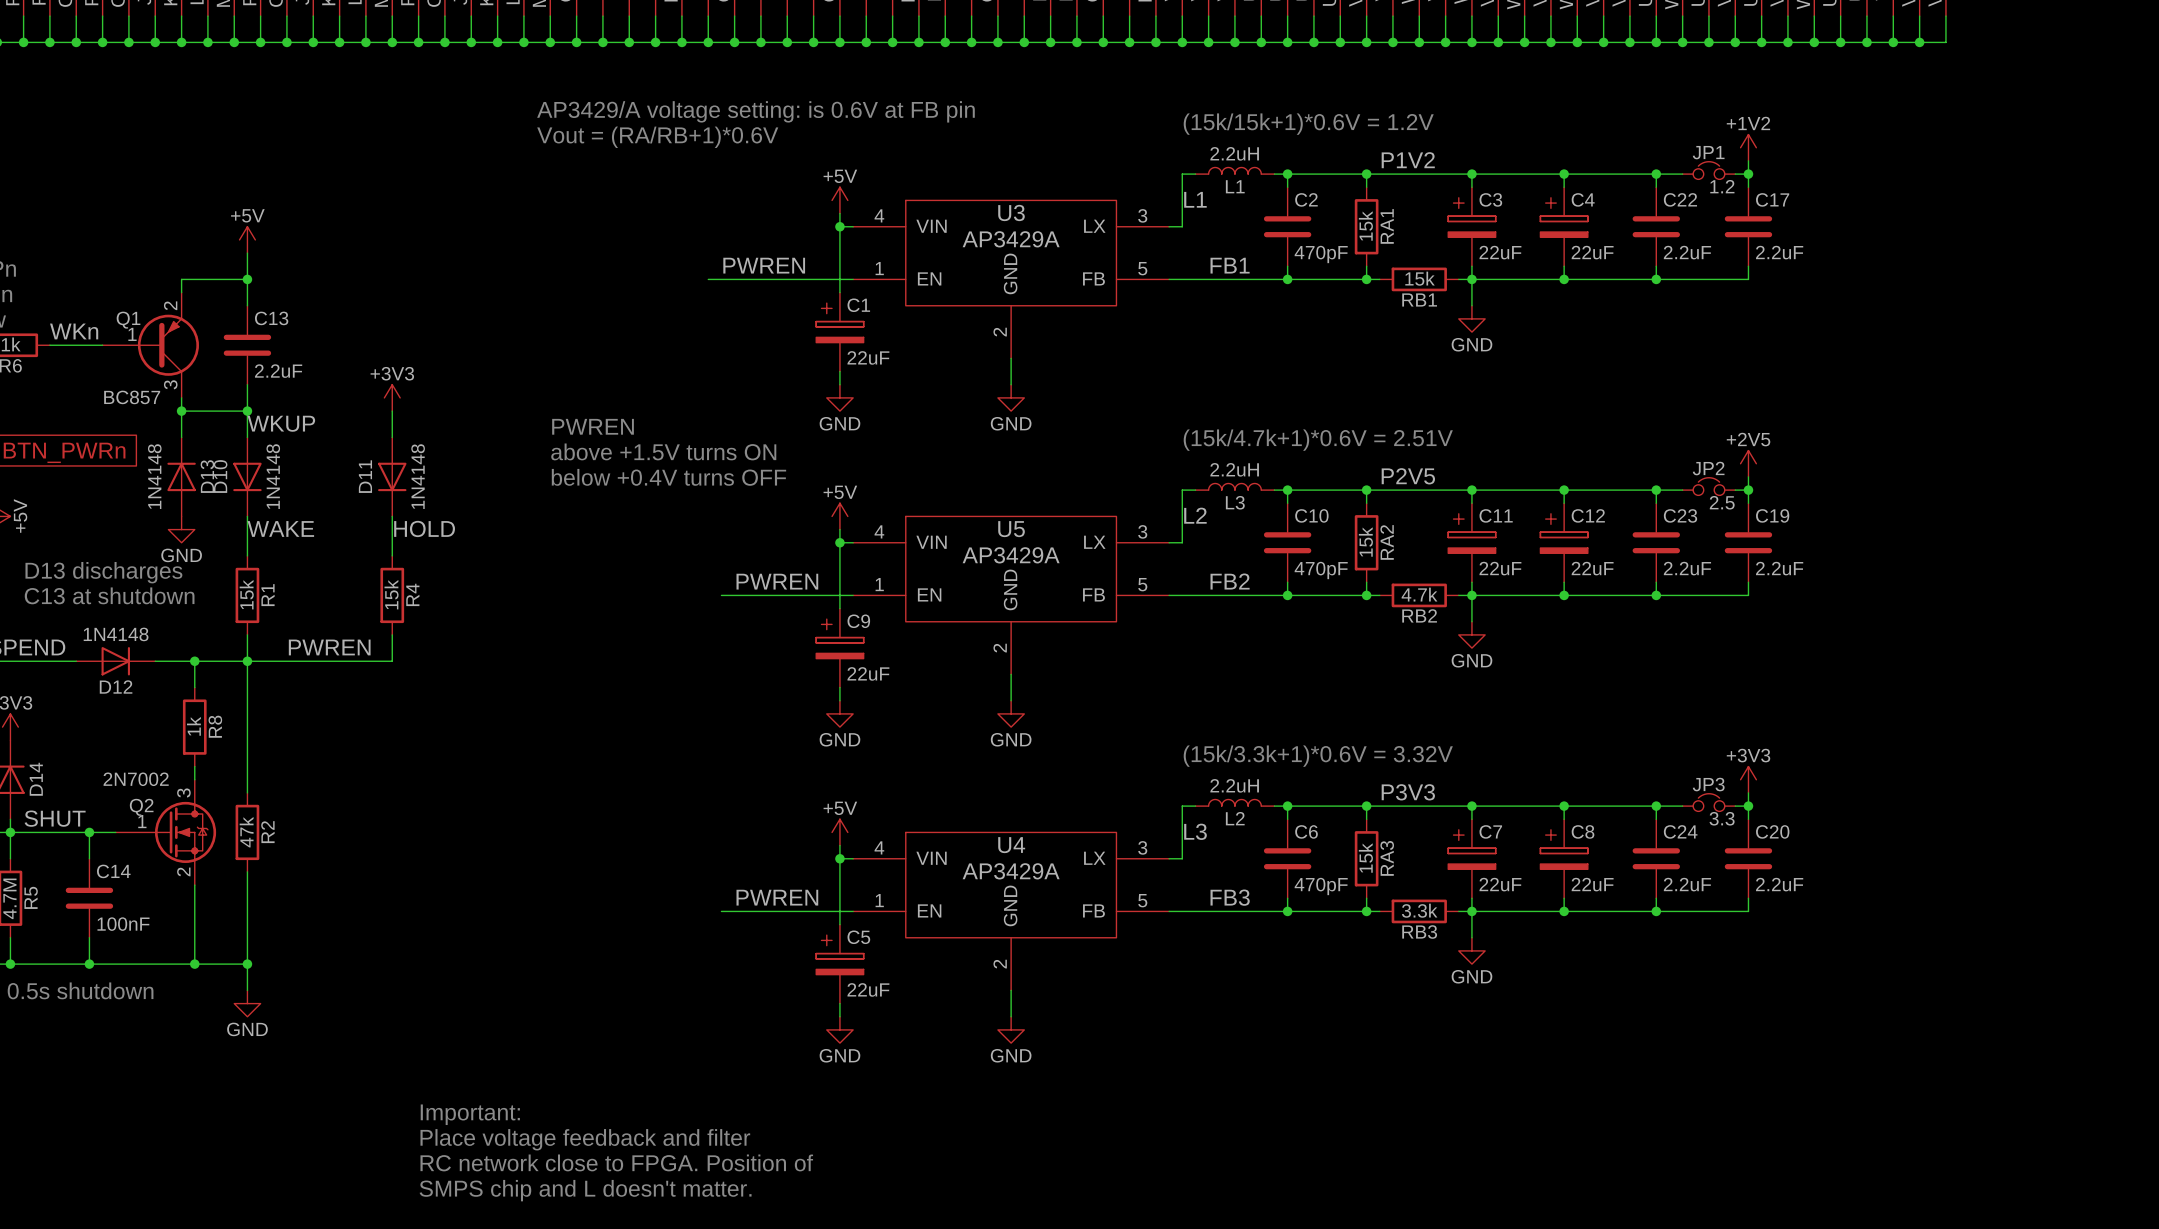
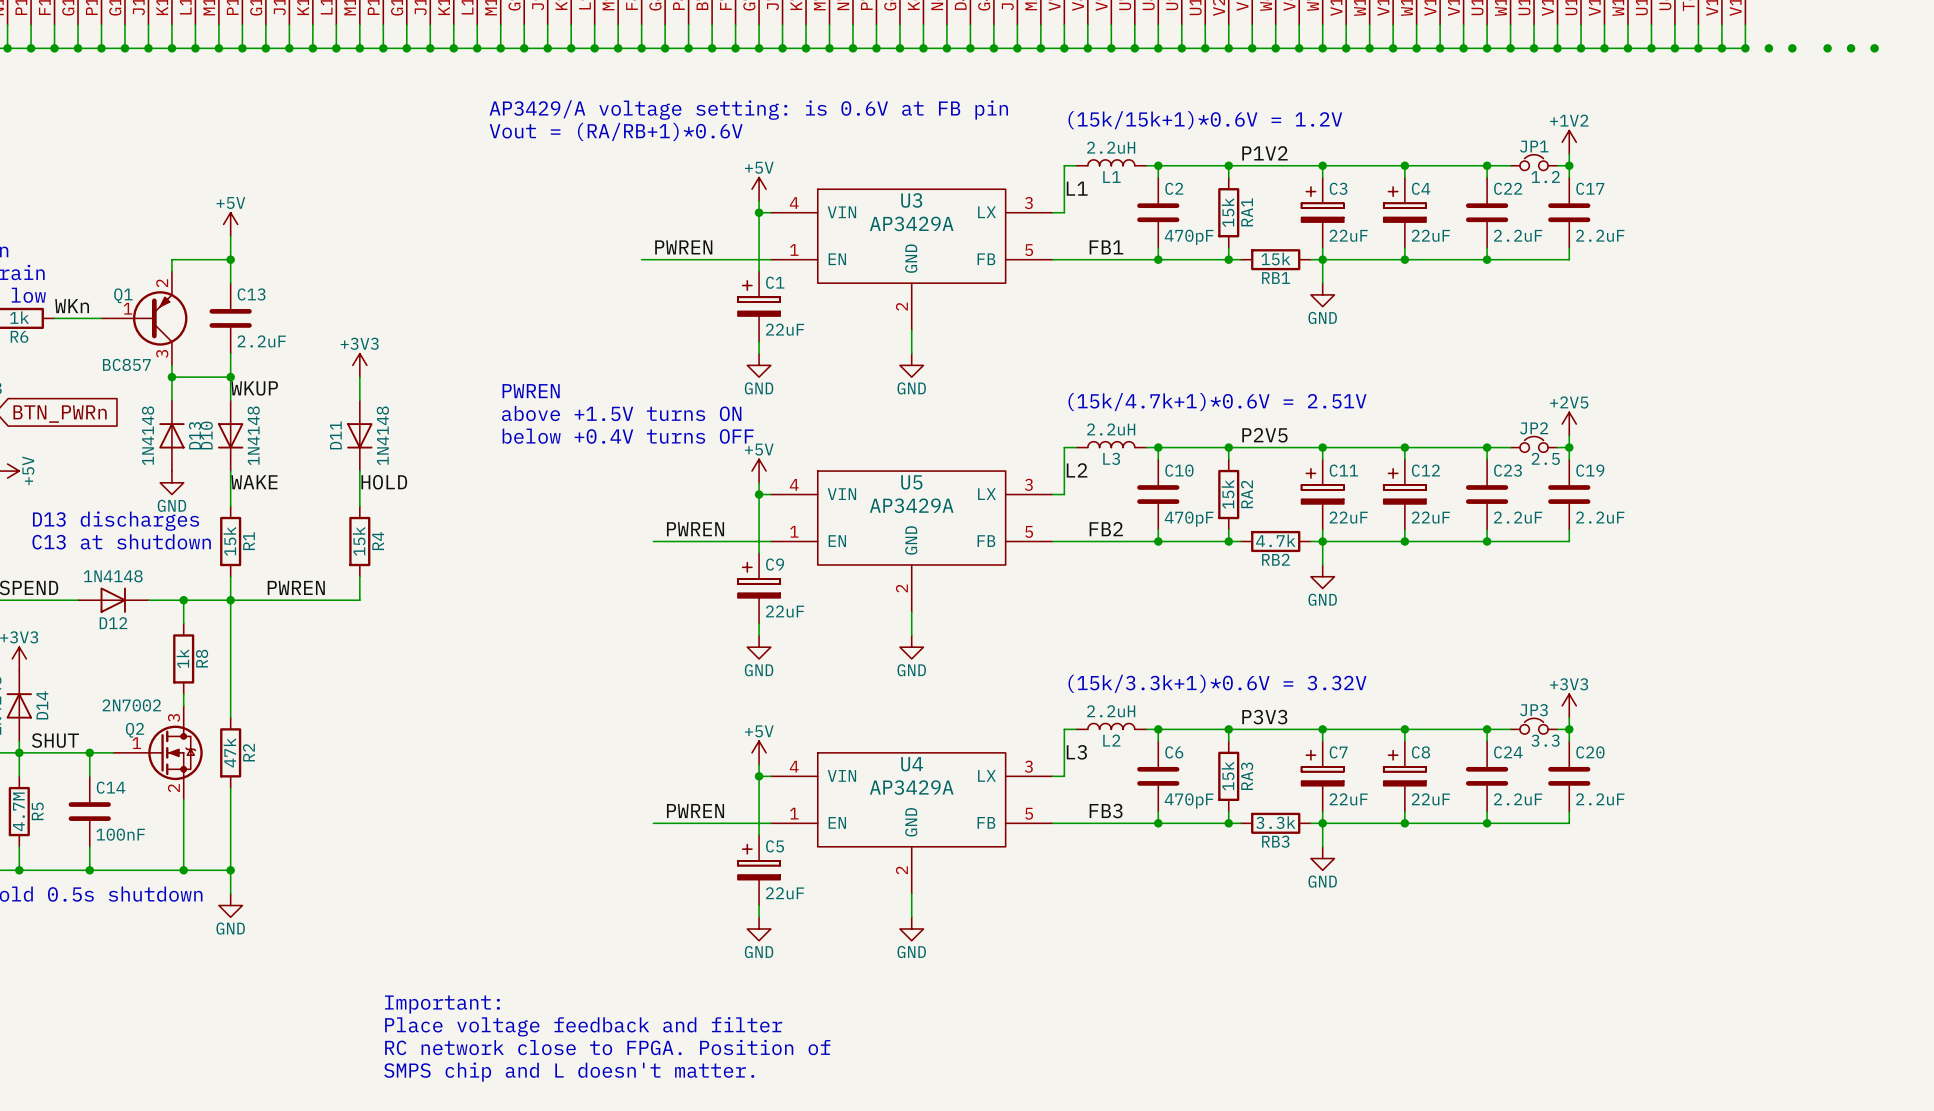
junction: none -> (1745, 48)
junction: none -> (1768, 48)
junction: none -> (1792, 48)
junction: none -> (1827, 48)
junction: none -> (1851, 48)
junction: none -> (1874, 48)

